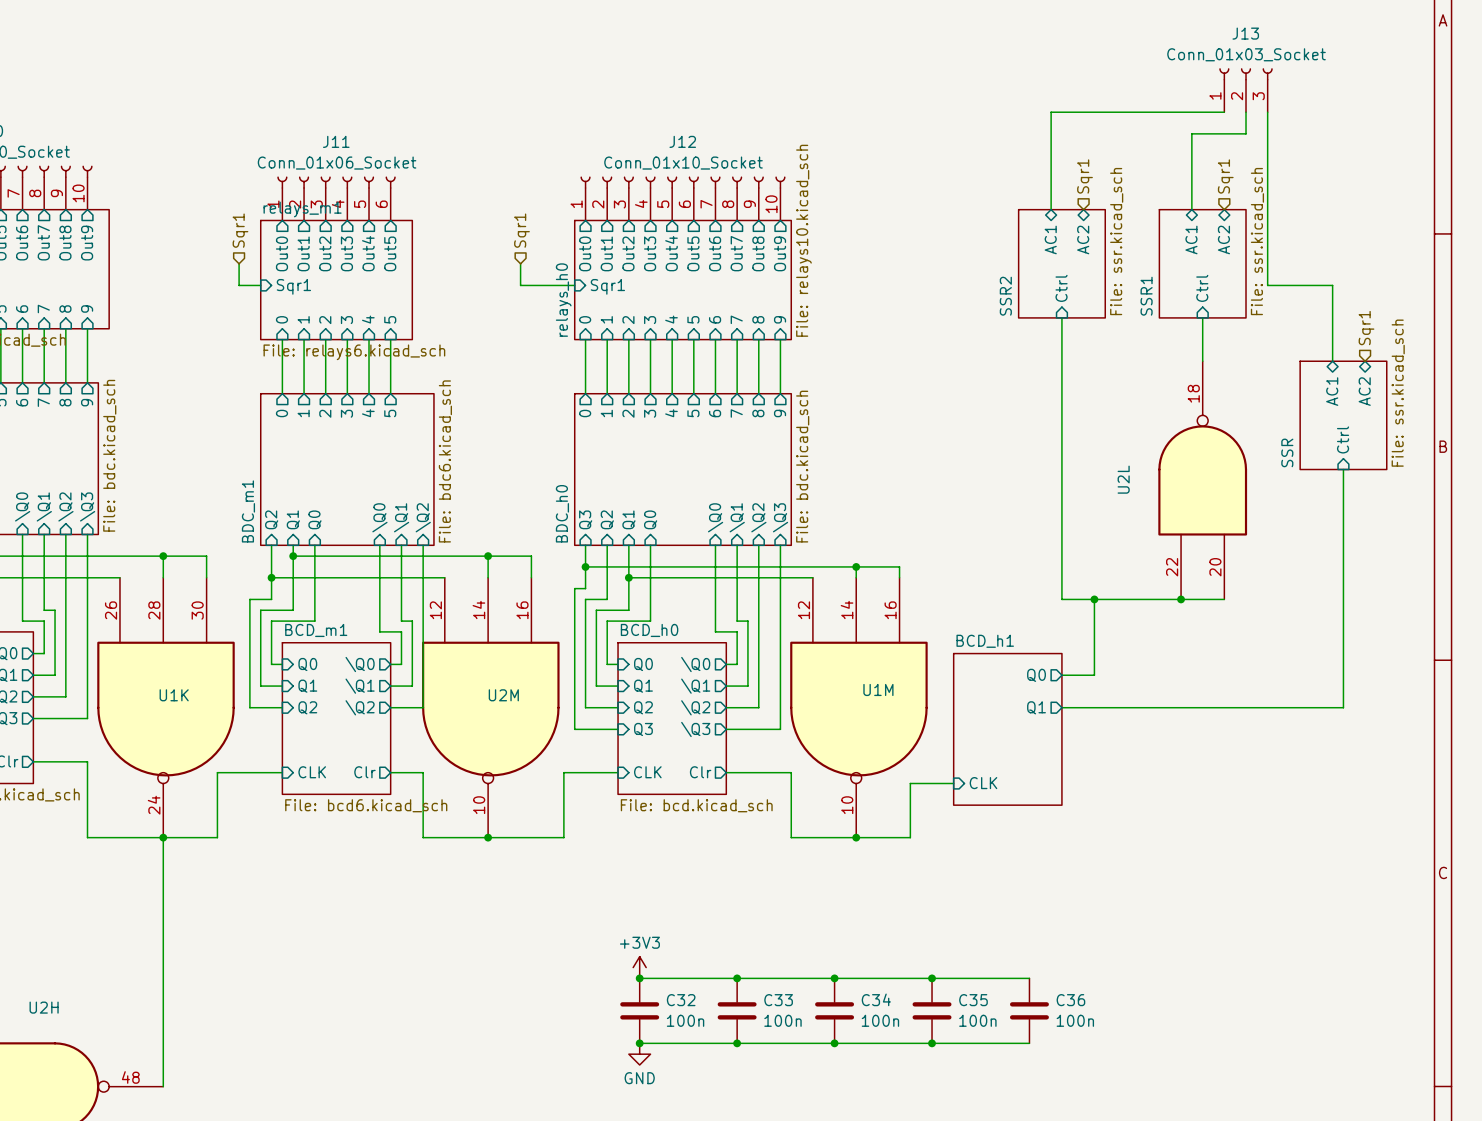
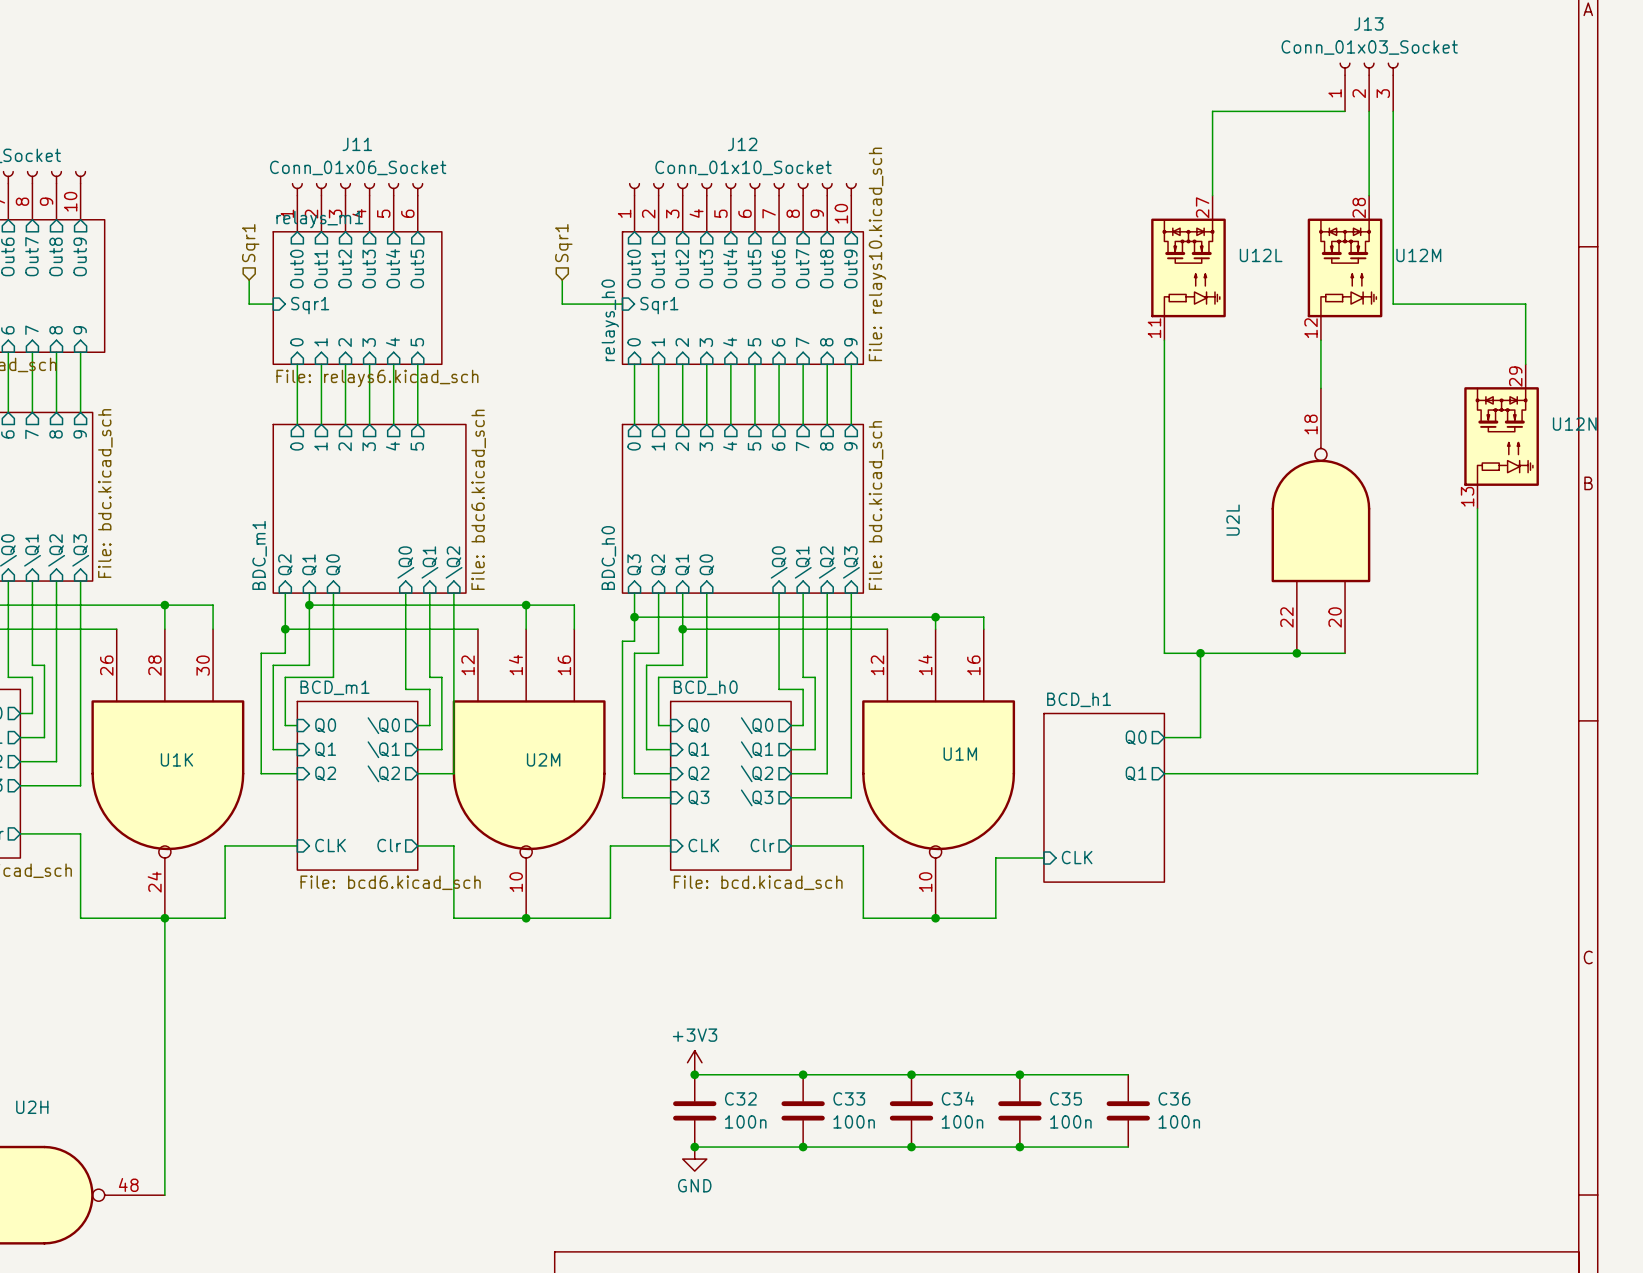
wire: (1105, 112) (1051, 112) (1051, 209) -> (1212, 111) (1212, 195)
wire: (1246, 133) (1191, 133) (1191, 209) -> (1369, 135) (1369, 195)
hierarchical label: Sqr1 (1084, 176) -> none
hierarchical label: Sqr1 (1225, 176) -> none
sheet pin: AC1 (1050, 239) -> none
sheet pin: AC2 (1083, 239) -> none
sheet pin: AC1 (1191, 239) -> none
sheet pin: AC2 (1223, 239) -> none
U12L: none -> (1188, 267)
U12M: none -> (1345, 267)
sheet SSR2: File: ssr.kicad_sch (1061, 263) -> none
sheet SSR1: File: ssr.kicad_sch (1202, 263) -> none
wire: (1332, 285) (1332, 361) -> (1465, 304) (1525, 304) (1525, 364)
sheet pin: Ctrl (1061, 288) -> none
sheet pin: Ctrl (1202, 288) -> none
hierarchical label: Sqr1 (1366, 328) -> none
sheet pin: AC1 (1332, 391) -> none
sheet pin: AC2 (1364, 391) -> none
U12N: none -> (1501, 436)
sheet SSR: File: ssr.kicad_sch (1343, 415) -> none
sheet pin: Ctrl (1343, 439) -> none

